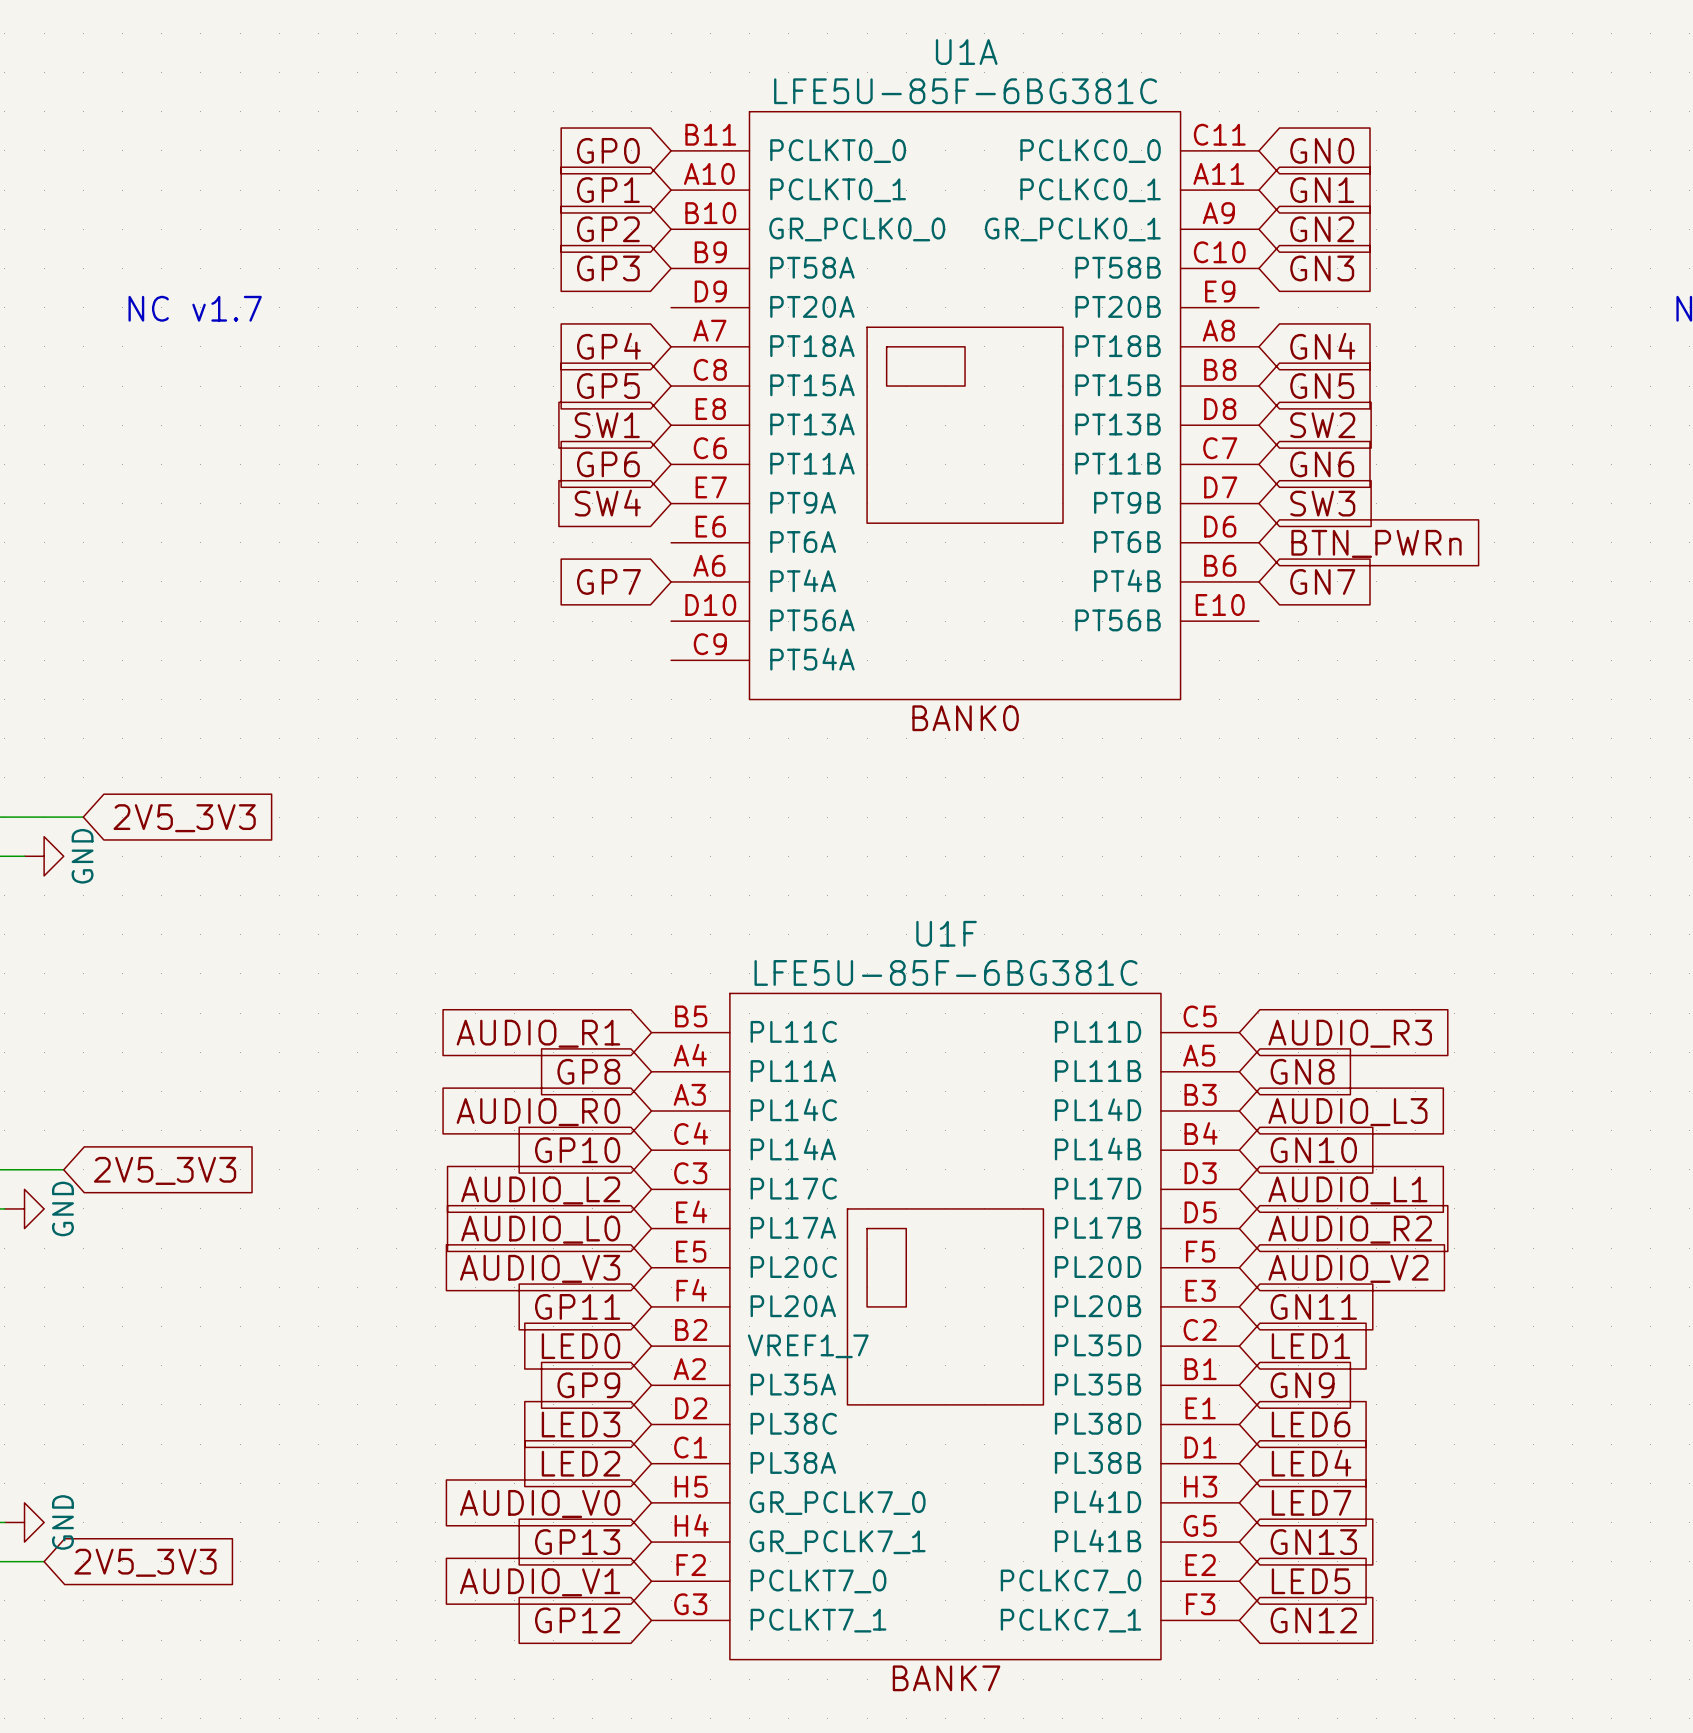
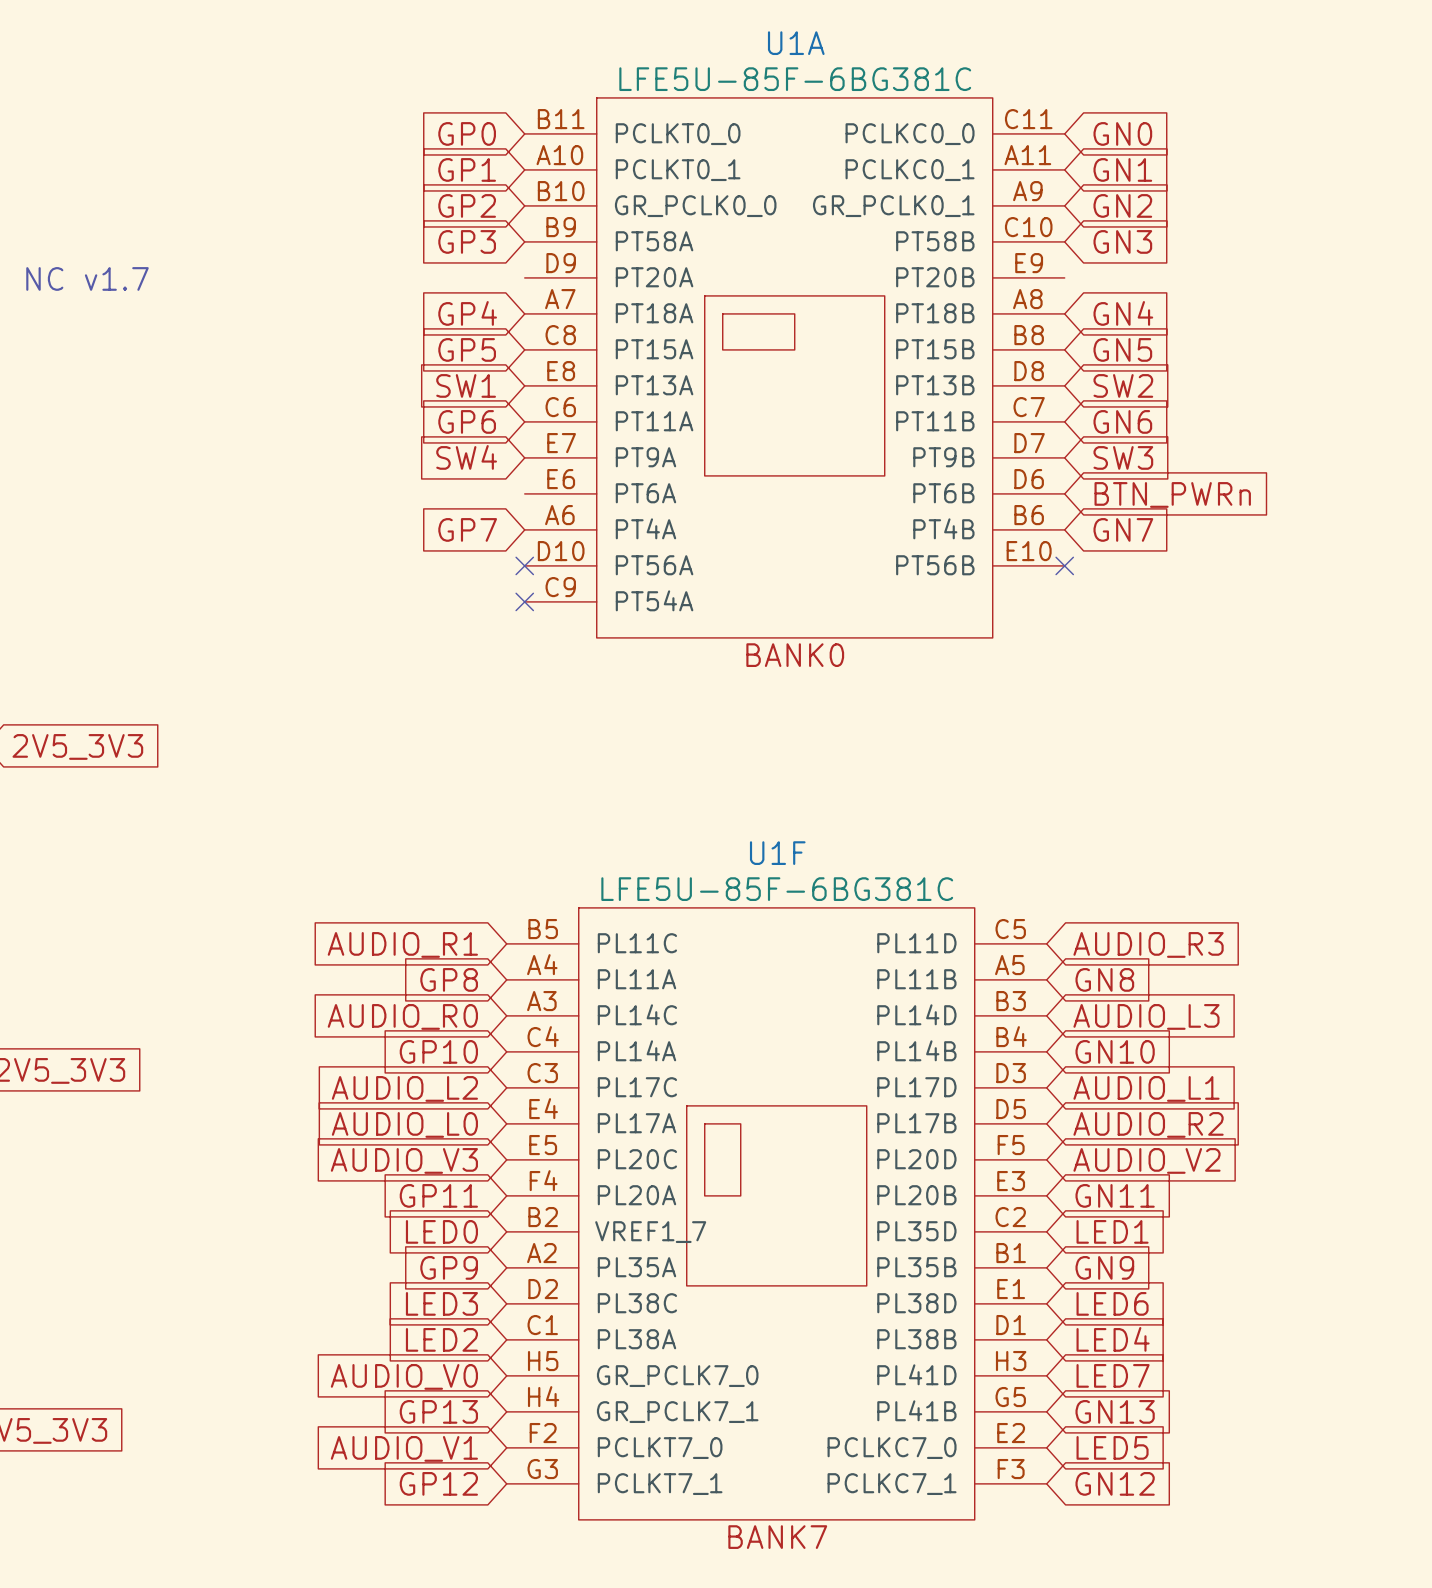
no-connect mark: none -> (524, 565)
no-connect mark: none -> (1064, 565)
no-connect mark: none -> (524, 601)

